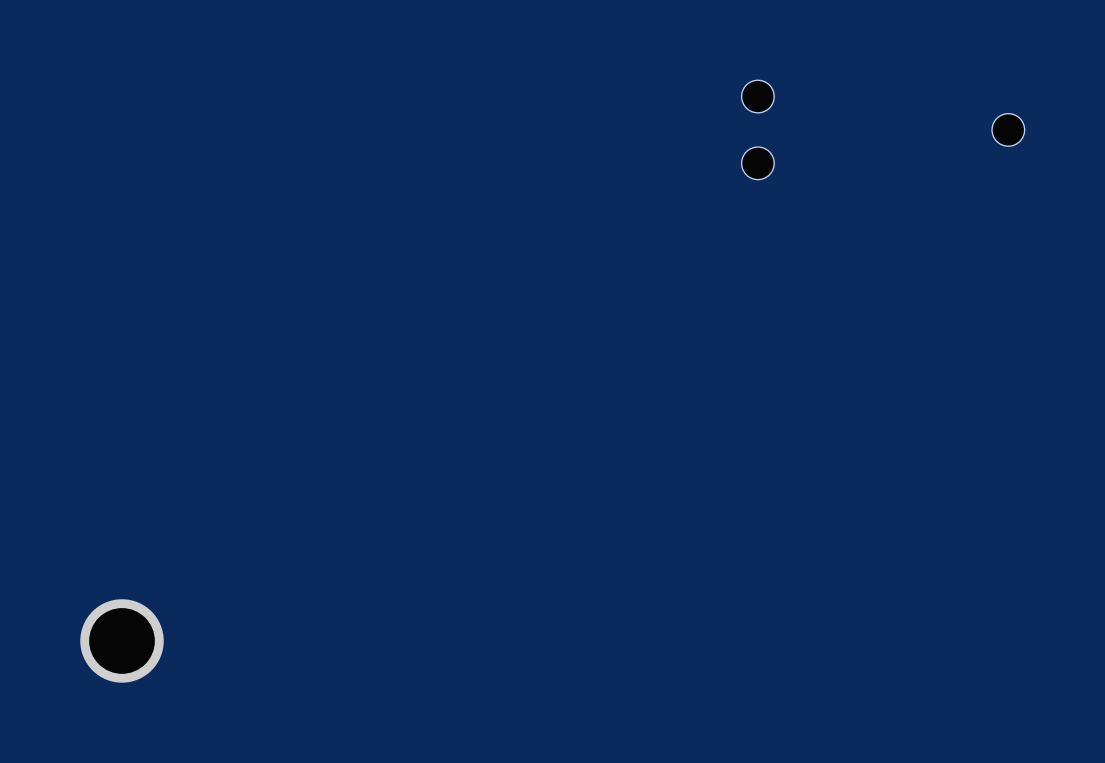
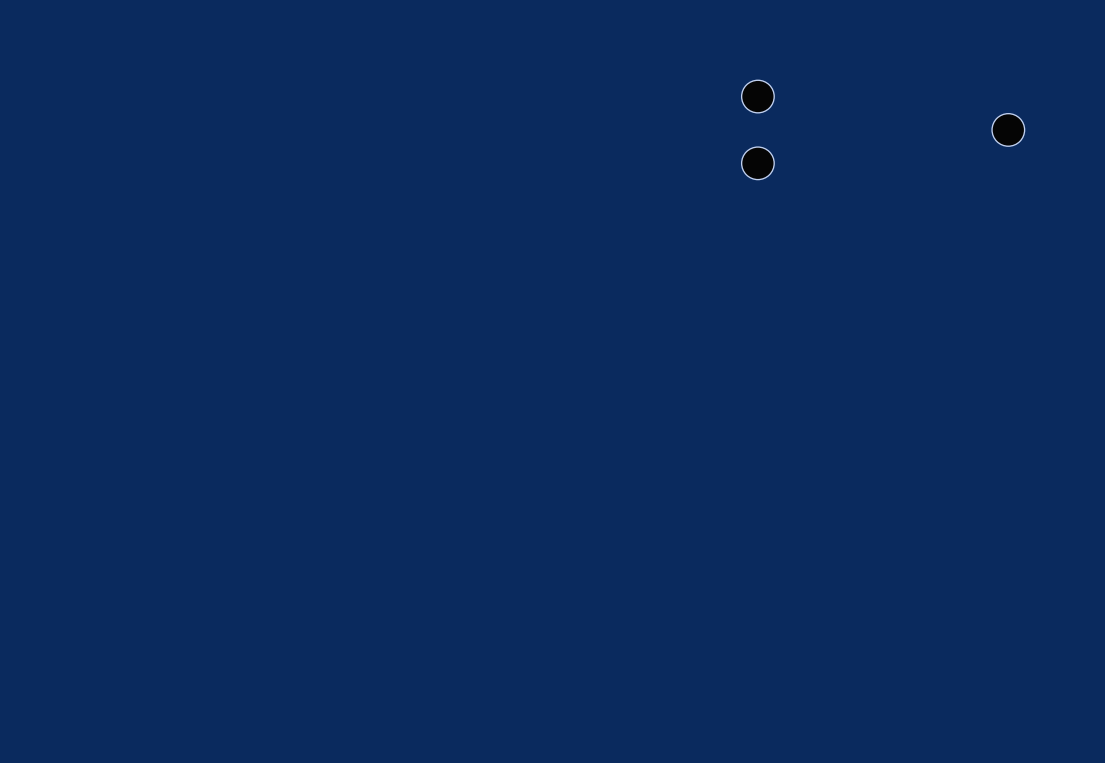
part: (122, 640) -> none

